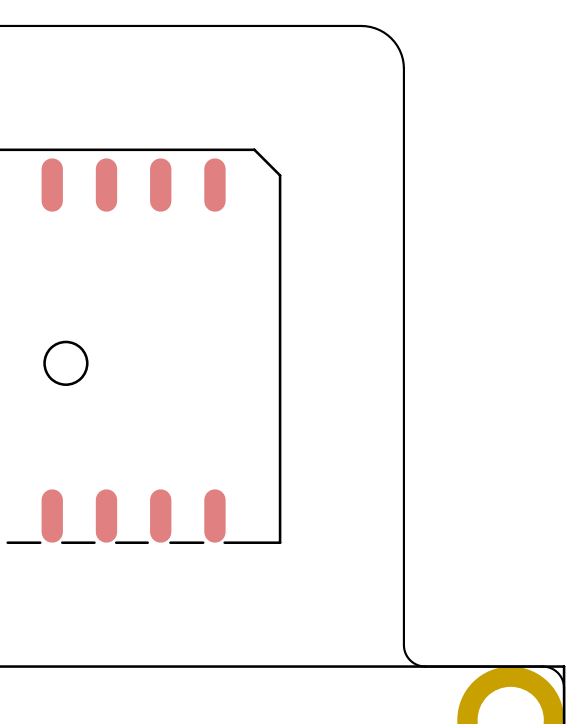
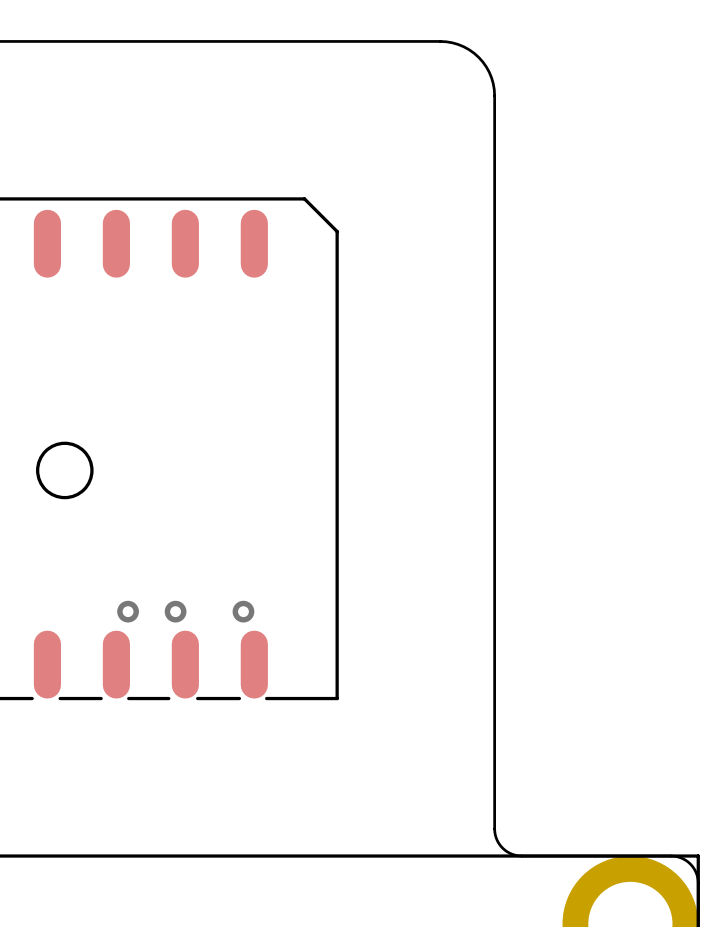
via: none -> (128, 611)
via: none -> (175, 611)
via: none -> (243, 611)

